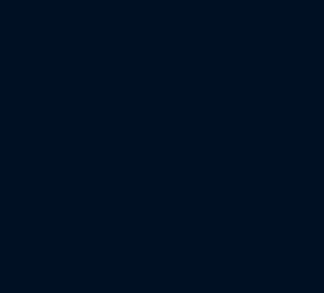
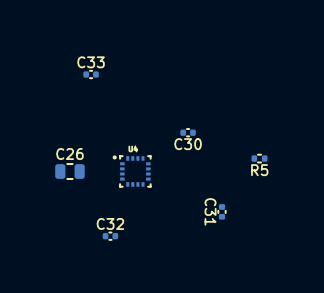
C33: none -> (91, 74)
C30: none -> (188, 132)
R5: none -> (259, 158)
C26: none -> (69, 171)
part: none -> (131, 171)
C31: none -> (221, 211)
C32: none -> (110, 236)

